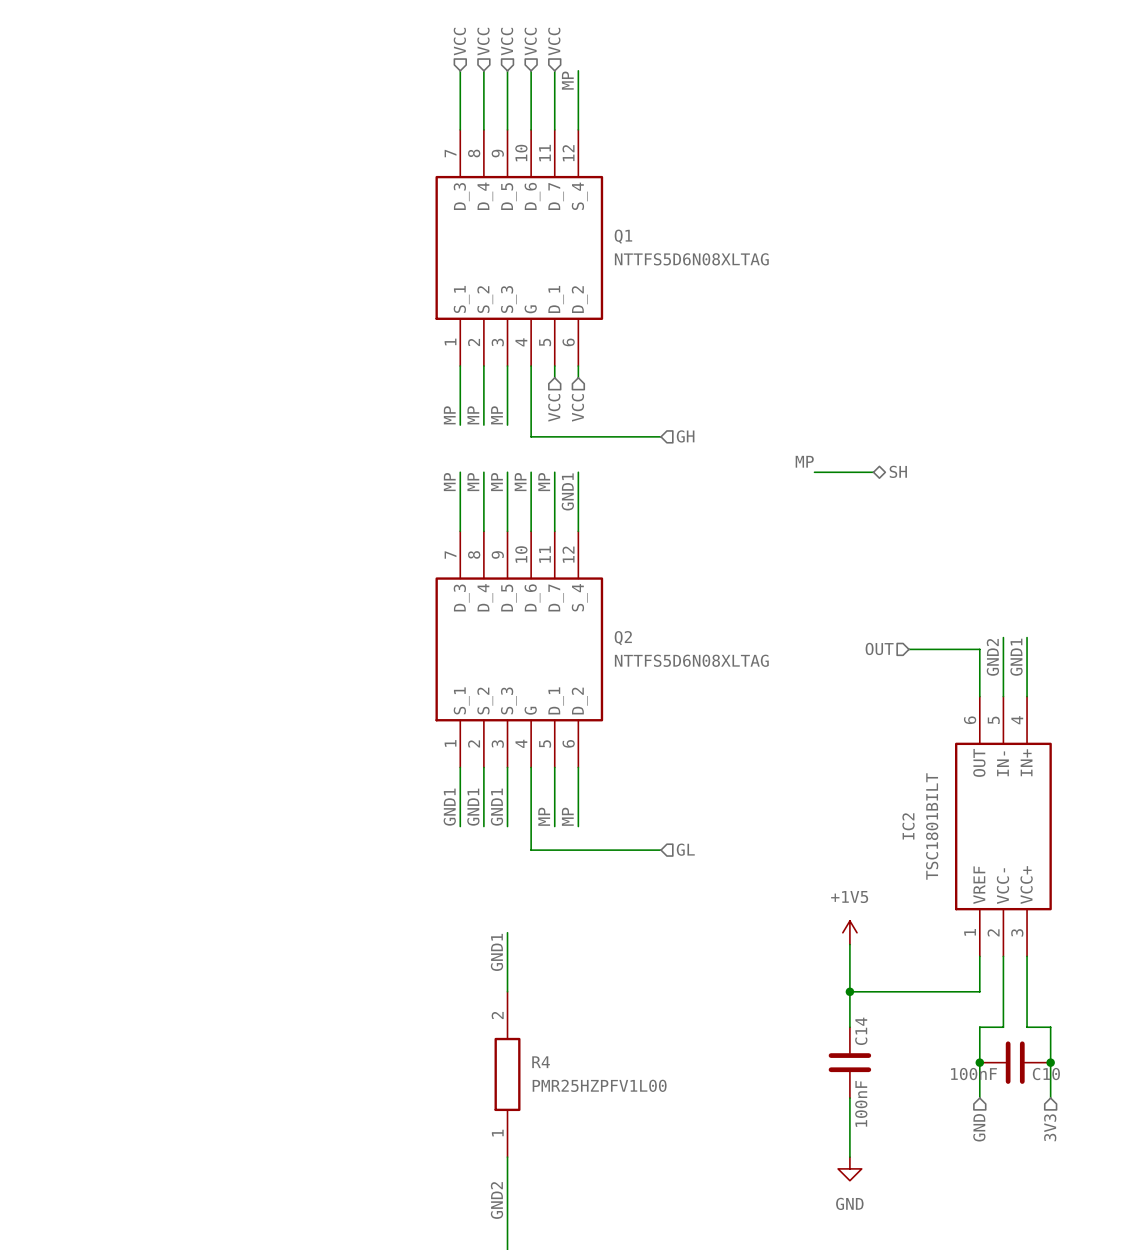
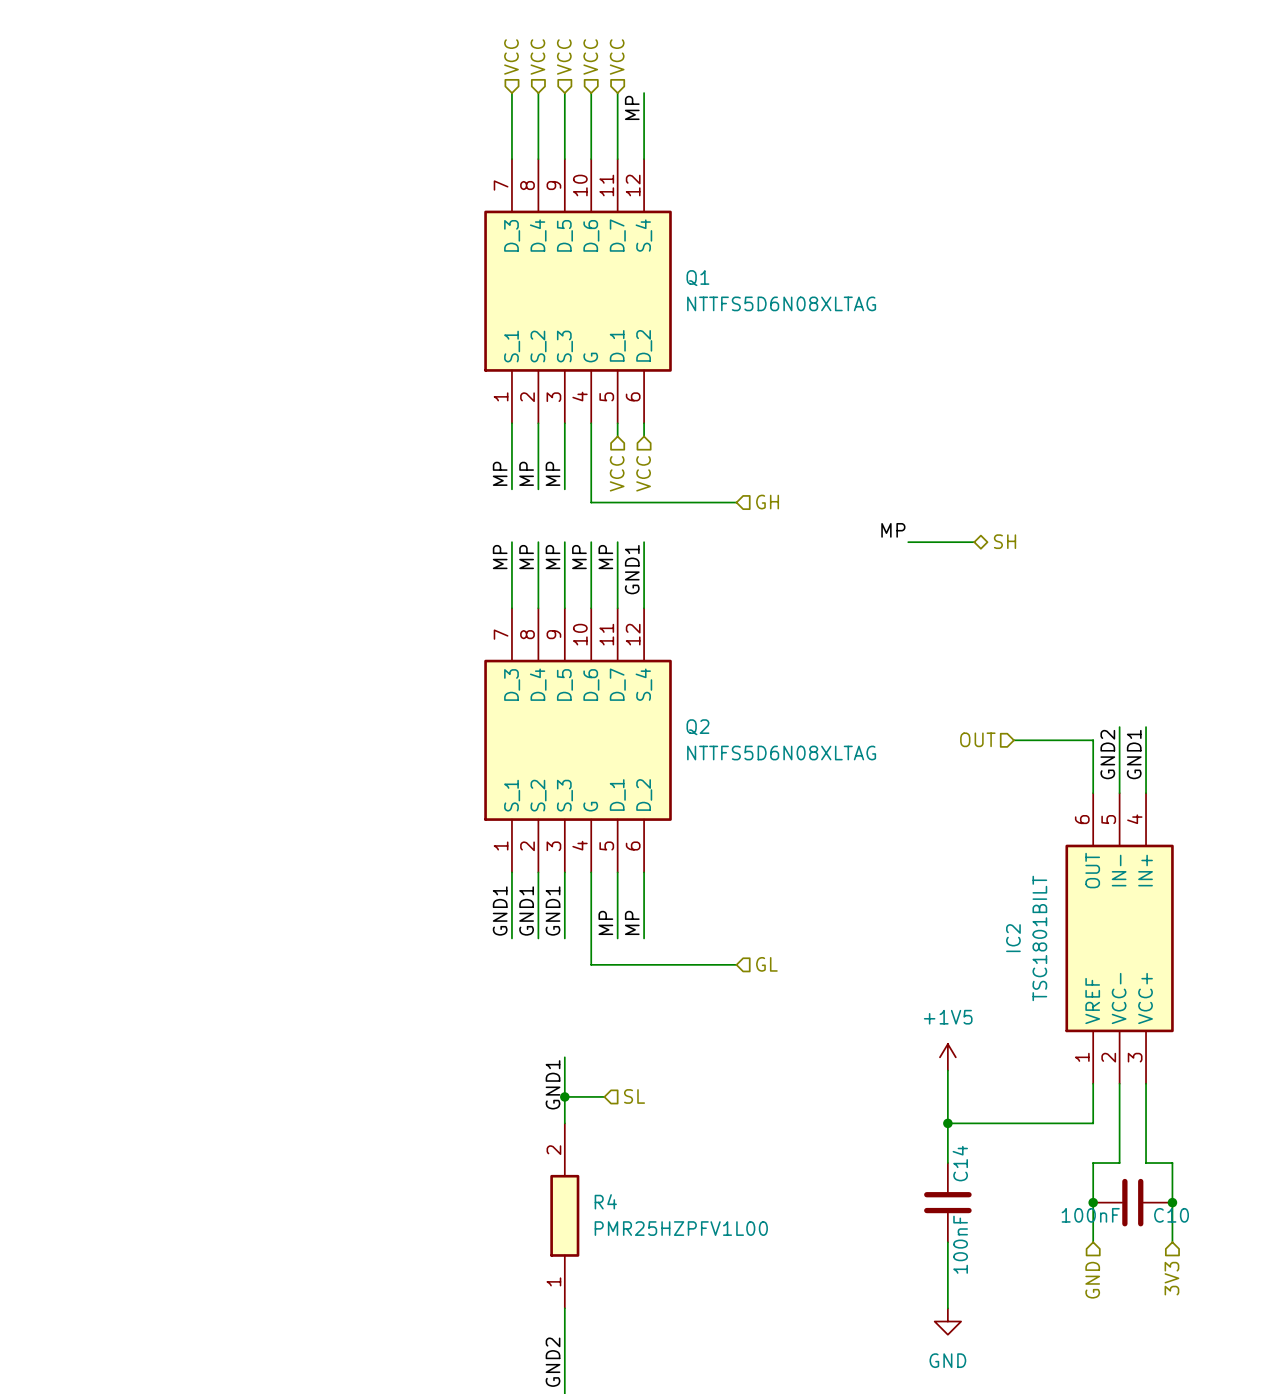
hierarchical label: none -> SL (634, 1096)
wire: none -> (564, 1096) (604, 1096)
junction: none -> (564, 1096)

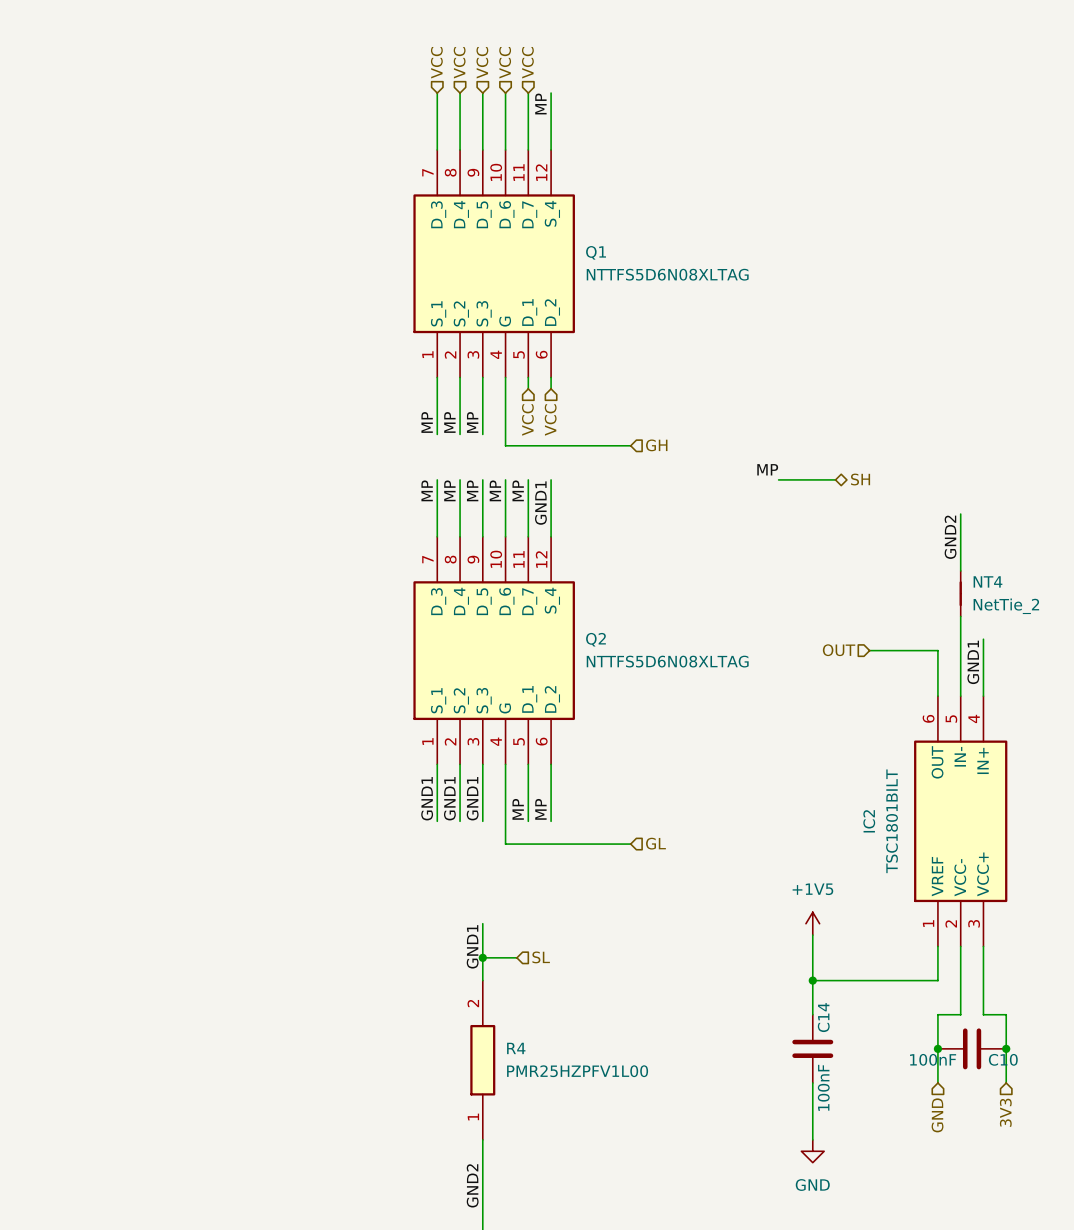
wire: none -> (960, 514) (960, 570)
NT4: none -> NetTie_2 (960, 593)
wire: none -> (960, 616) (960, 639)
label position: GND2 (1107, 754) -> GND2 (950, 537)

